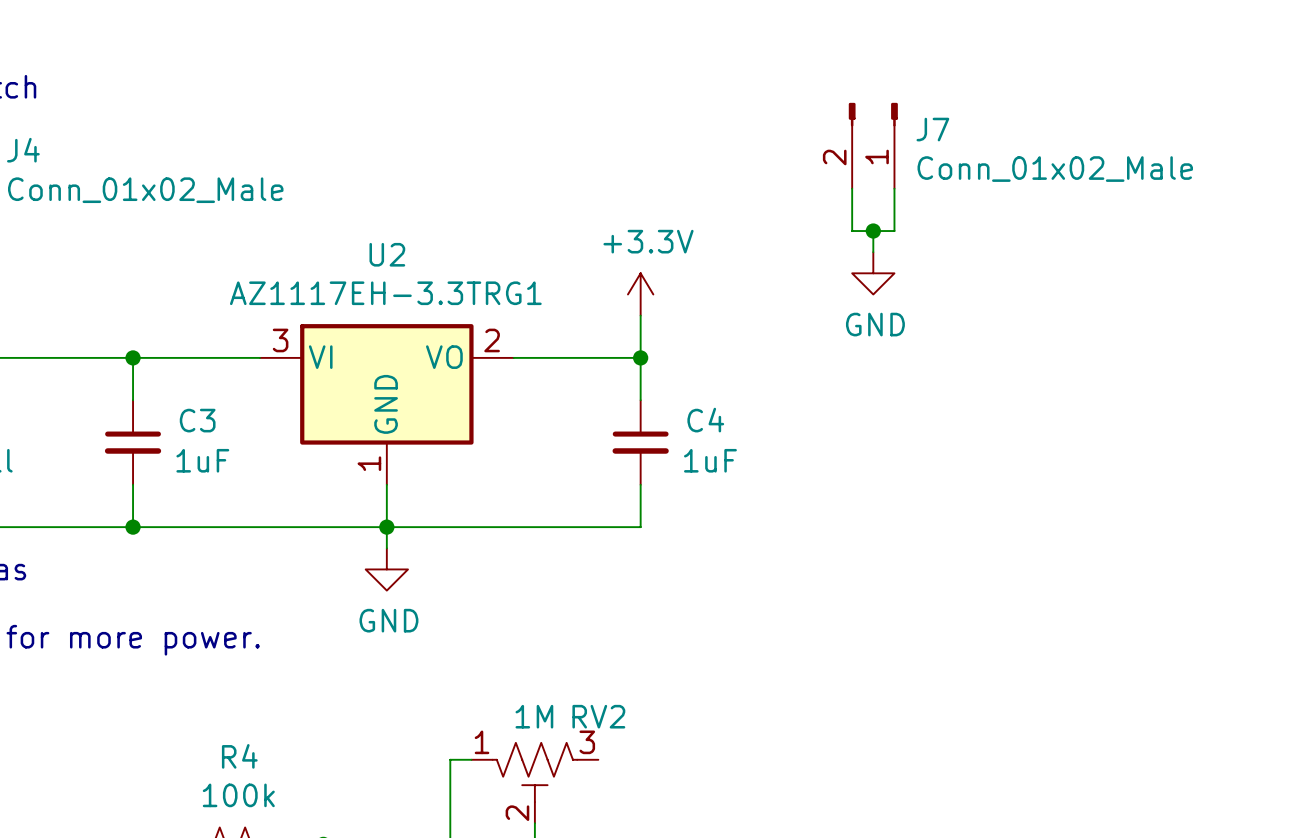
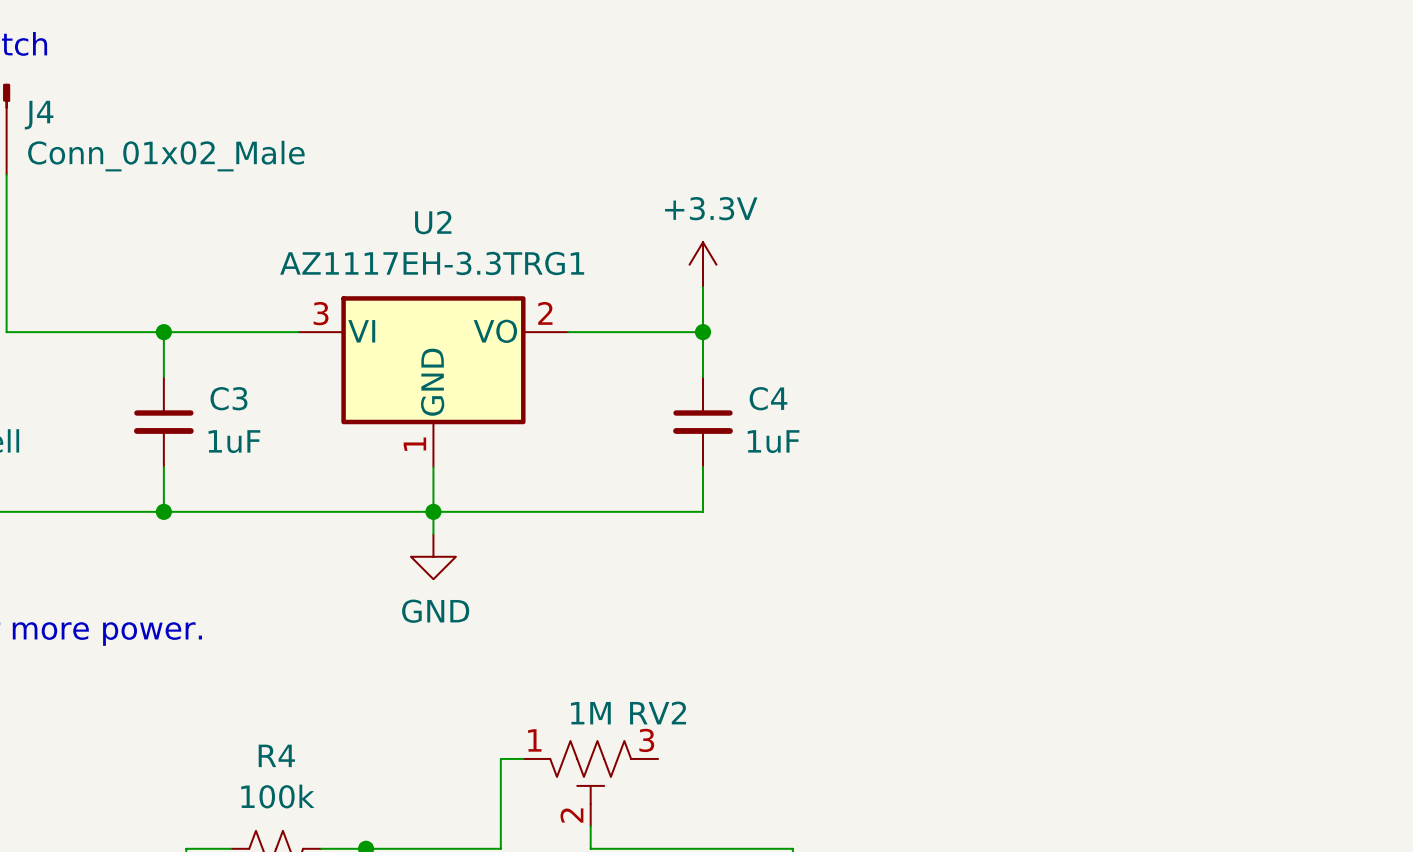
J7: Conn_01x02_Male (873, 145) -> none
wire: (852, 188) (852, 231) (894, 231) (894, 188) -> none
wire: (873, 231) (873, 252) -> none
junction: (873, 231) -> none
power symbol: GND (873, 273) -> none

